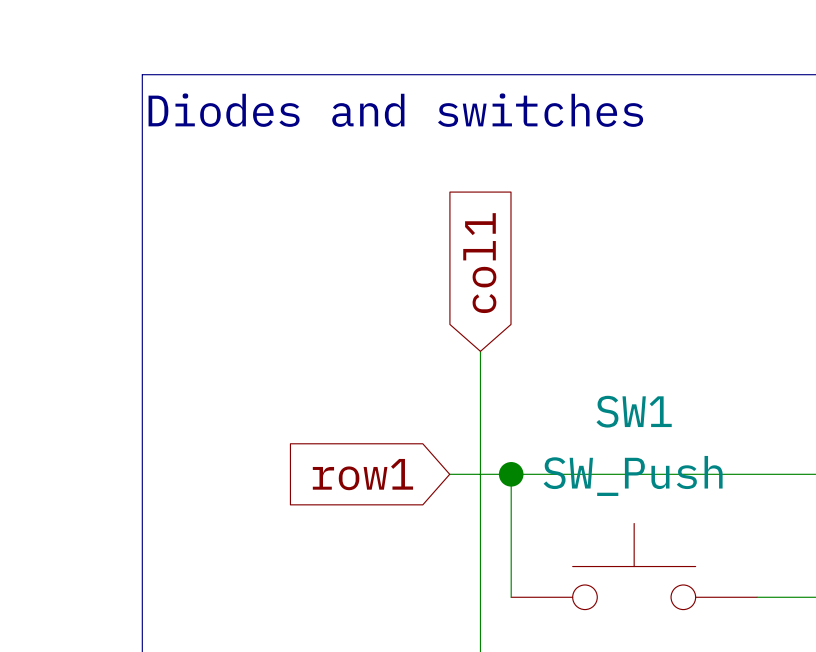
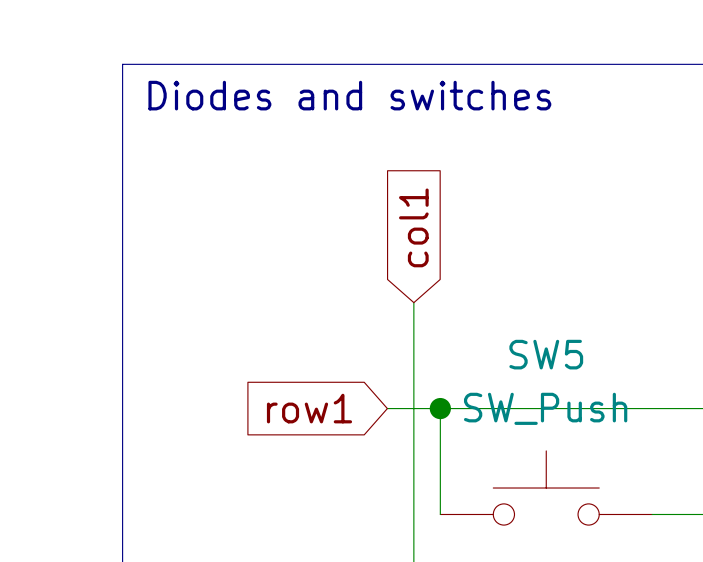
SW1 name: SW1 (634, 411) -> SW5 (546, 354)

